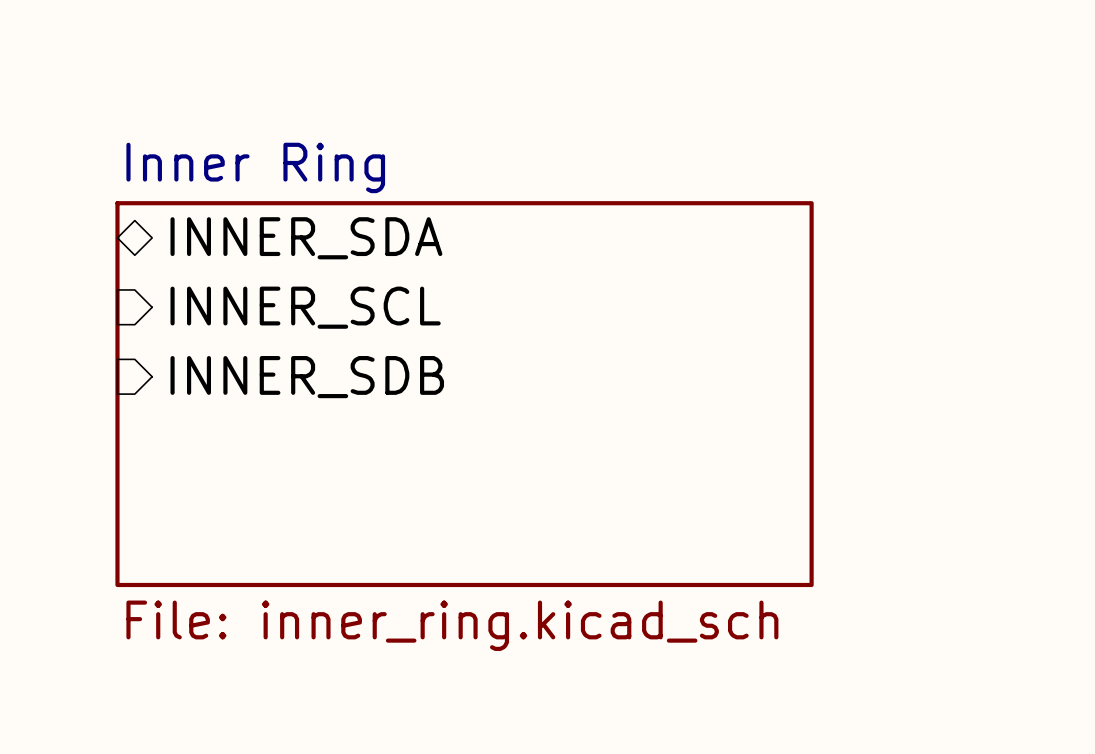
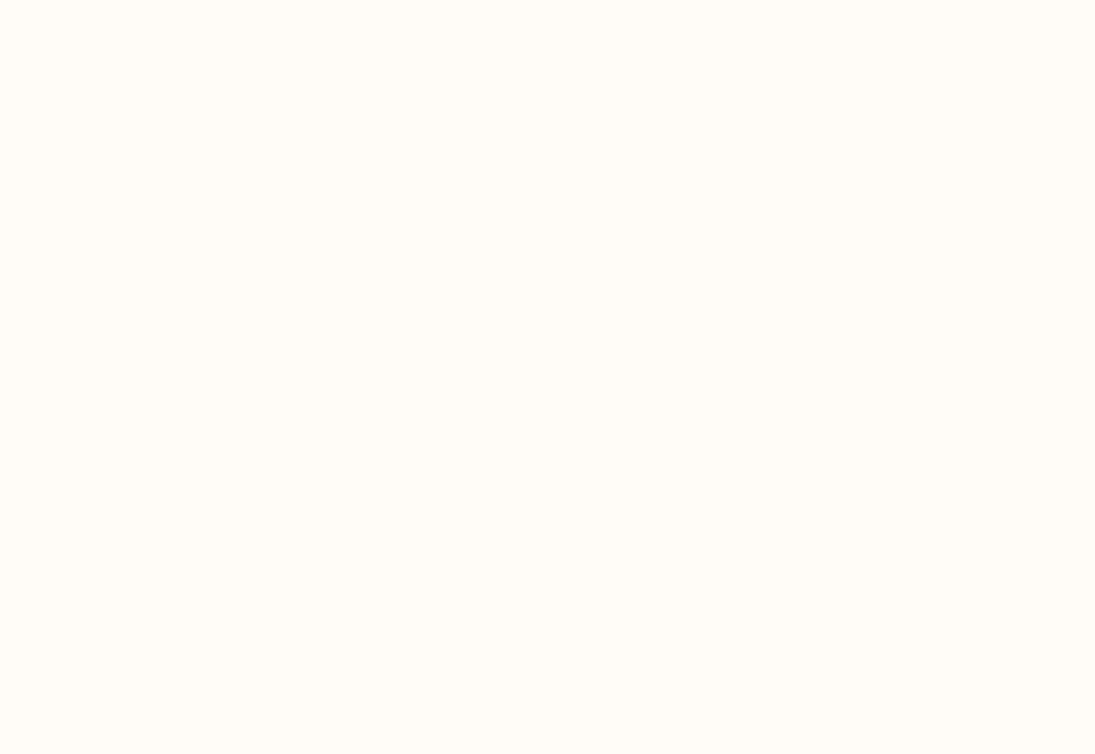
sheet pin: INNER_SDA (306, 238) -> none
sheet pin: INNER_SCL (305, 307) -> none
sheet pin: INNER_SDB (307, 377) -> none
sheet Inner Ring: File: inner_ring.kicad_sch (464, 394) -> none

